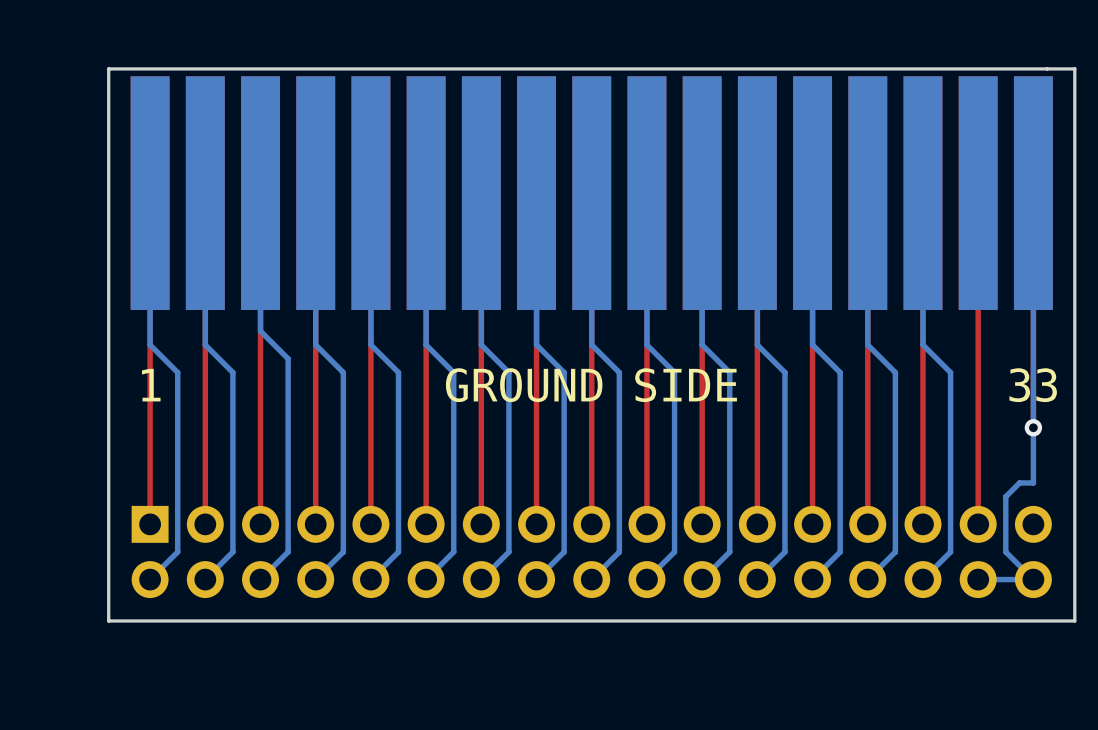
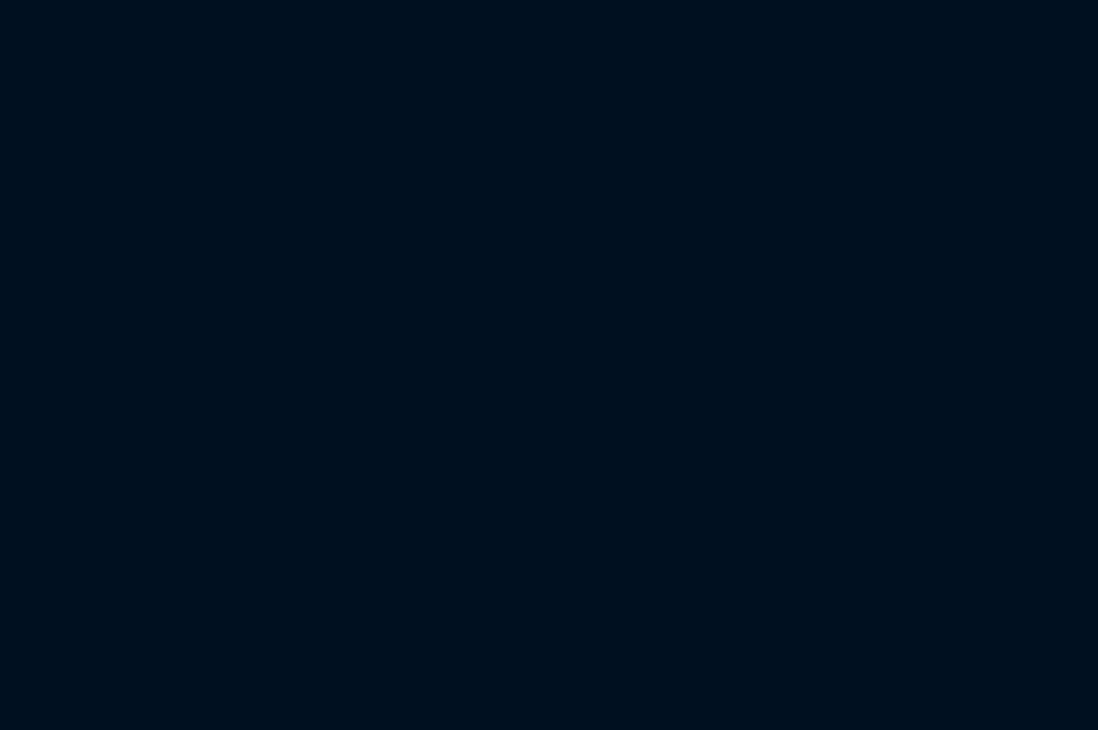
board edge: (1074, 68) (108, 68) (108, 620) (1074, 620) (1074, 68) -> none
top track: (150, 193) (150, 524) -> none
bottom track: (150, 193) (150, 344) (177, 372) (177, 551) (150, 579) -> none
top track: (205, 193) (205, 524) -> none
bottom track: (205, 193) (205, 344) (232, 372) (232, 551) (205, 579) -> none
bottom track: (260, 193) (260, 331) (288, 358) (288, 551) (260, 579) -> none
top track: (315, 193) (315, 524) -> none
bottom track: (315, 193) (315, 344) (343, 372) (343, 551) (315, 579) -> none
top track: (370, 193) (370, 524) -> none
bottom track: (370, 193) (370, 344) (398, 372) (398, 551) (370, 579) -> none
top track: (426, 193) (426, 524) -> none
bottom track: (426, 193) (426, 344) (453, 372) (453, 551) (426, 579) -> none
top track: (481, 193) (481, 524) -> none
bottom track: (481, 193) (481, 344) (508, 372) (508, 551) (481, 579) -> none
top track: (536, 193) (536, 524) -> none
bottom track: (536, 193) (536, 344) (564, 372) (564, 551) (536, 579) -> none
top track: (591, 193) (591, 524) -> none
bottom track: (591, 193) (591, 344) (619, 372) (619, 551) (591, 579) -> none
part: (591, 193) -> none
top track: (646, 193) (646, 524) -> none
bottom track: (646, 193) (646, 344) (674, 372) (674, 551) (646, 579) -> none
top track: (702, 193) (702, 524) -> none
bottom track: (702, 193) (702, 344) (729, 372) (729, 551) (702, 579) -> none
top track: (757, 193) (757, 524) -> none
bottom track: (757, 193) (757, 344) (784, 372) (784, 551) (757, 579) -> none
top track: (812, 193) (812, 524) -> none
bottom track: (812, 193) (812, 344) (840, 372) (840, 551) (812, 579) -> none
top track: (867, 193) (867, 524) -> none
bottom track: (867, 193) (867, 344) (895, 372) (895, 551) (867, 579) -> none
top track: (922, 193) (922, 524) -> none
bottom track: (922, 193) (922, 344) (950, 372) (950, 551) (922, 579) -> none
top track: (978, 193) (978, 524) -> none
bottom track: (1033, 193) (1033, 482) (1019, 482) (1005, 496) (1005, 551) (1033, 579) (978, 579) -> none
top track: (260, 303) (260, 524) -> none
text: 1 (151, 385) -> none
text: GROUND SIDE (591, 385) -> none
text: 33 (1033, 385) -> none
via: (1033, 427) -> none
part: (591, 551) -> none

